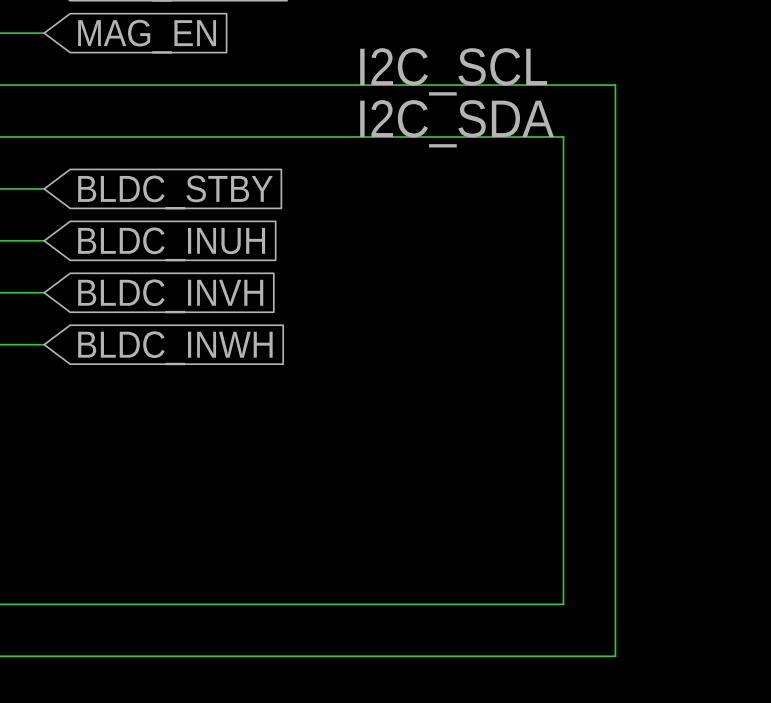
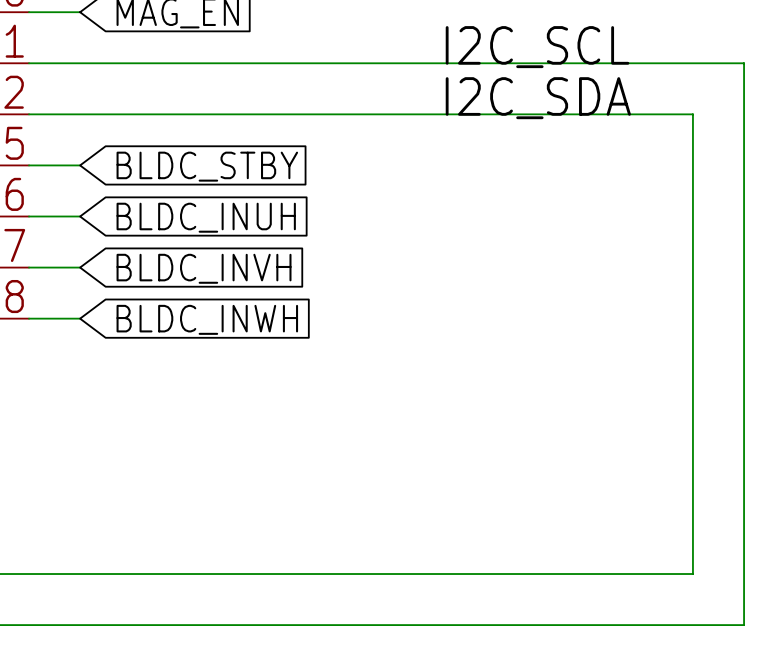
label position: I2C_SCL (453, 71) -> I2C_SCL (537, 47)
wire: (615, 85) (615, 656) -> (641, 63) (744, 63) (744, 625) (641, 625)
label position: I2C_SDA (457, 123) -> I2C_SDA (538, 98)
wire: (563, 136) (563, 604) -> (590, 114) (692, 114) (692, 574) (590, 574)

